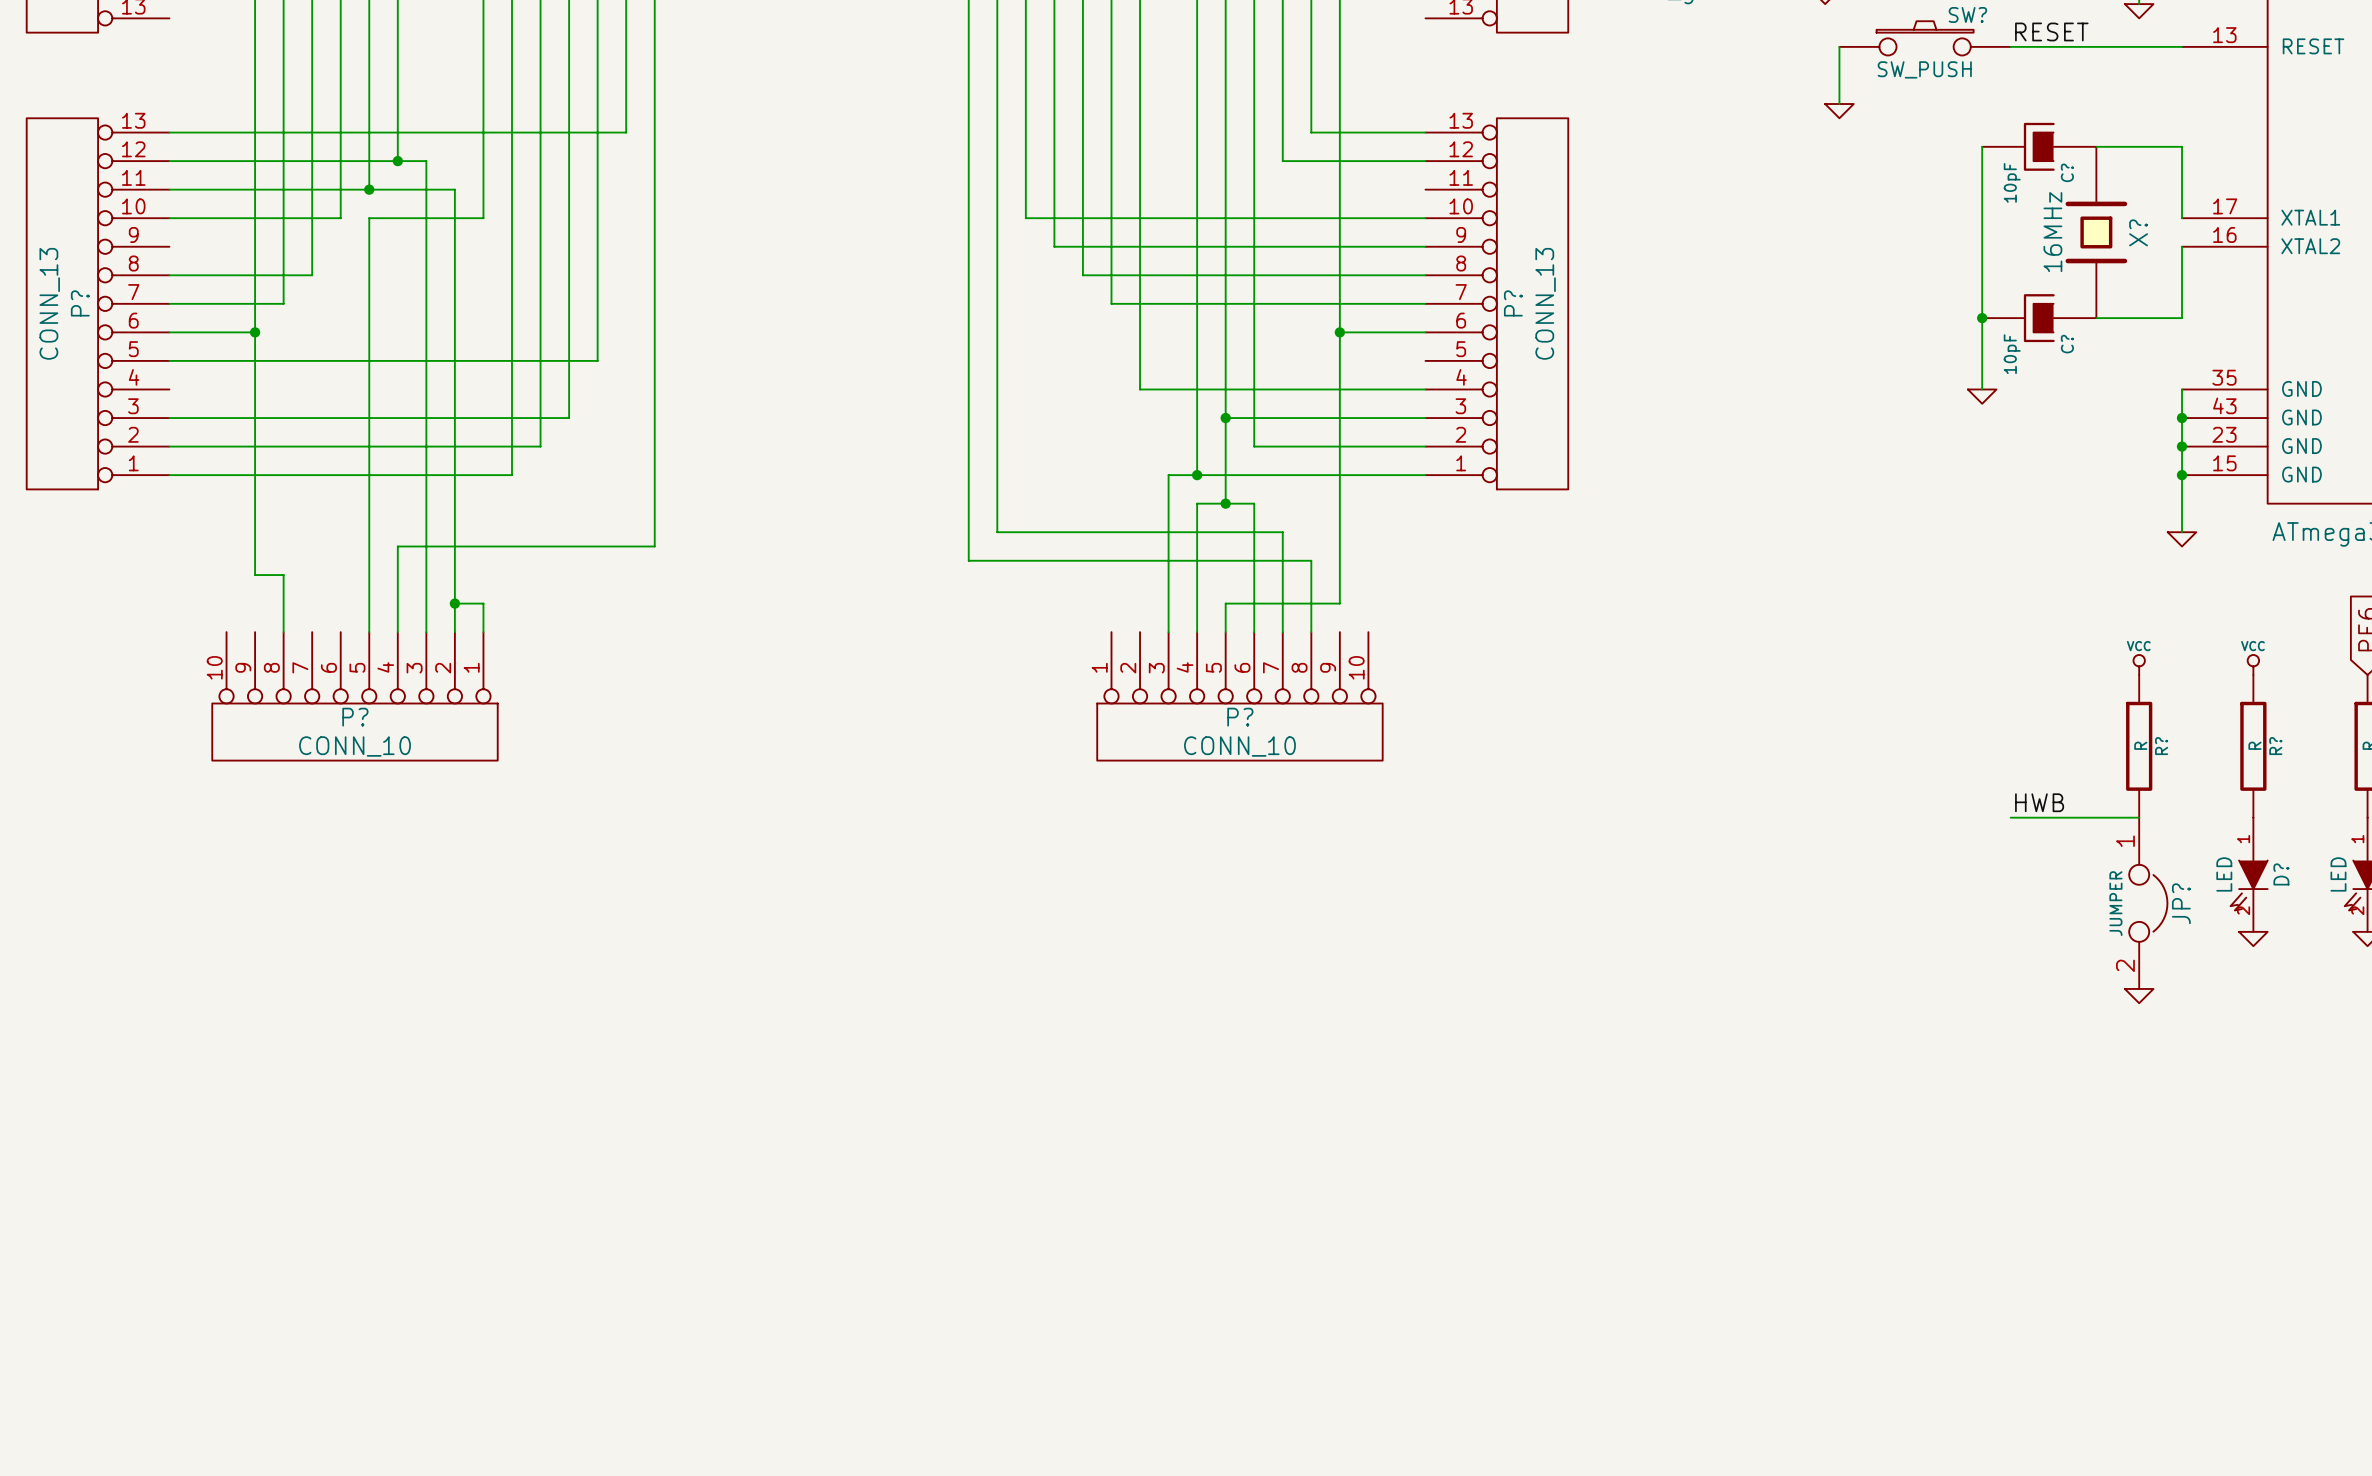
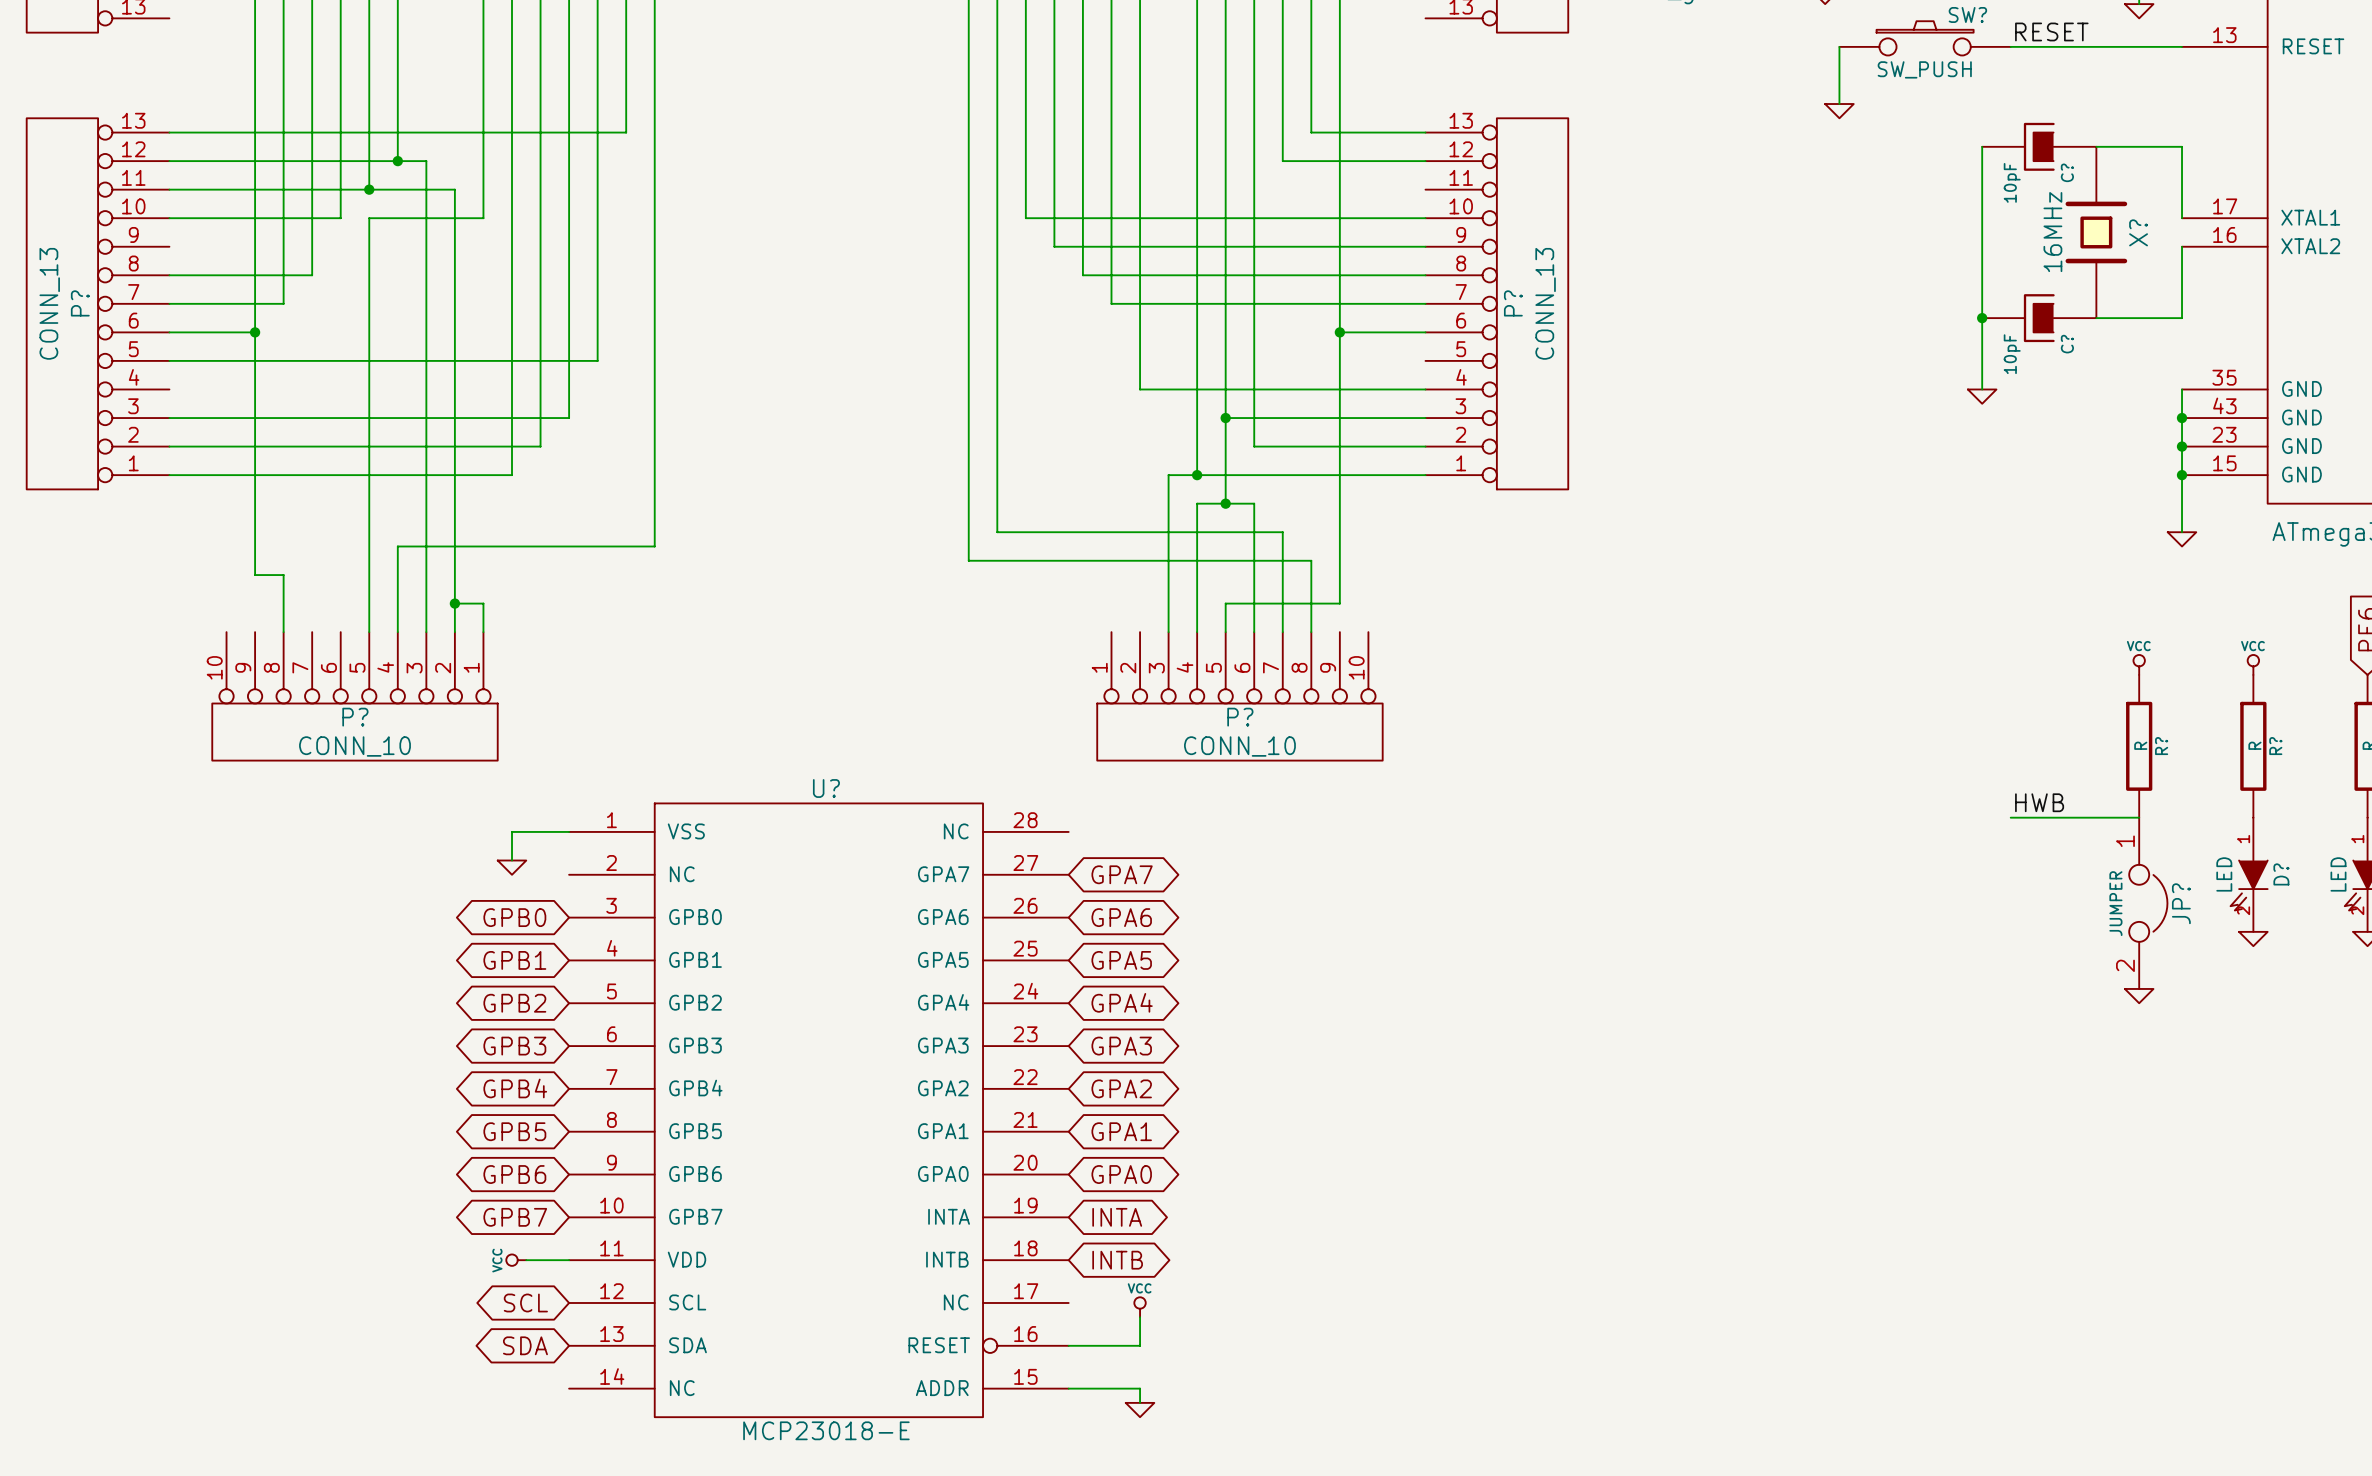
wire: none -> (569, 831) (512, 831) (512, 860)
power symbol: none -> (512, 867)
global label: none -> GPA7 (1122, 874)
global label: none -> GPB0 (514, 917)
global label: none -> GPA6 (1121, 917)
global label: none -> GPB1 (514, 960)
global label: none -> GPA5 (1121, 960)
global label: none -> GPA4 (1122, 1002)
global label: none -> GPB2 (514, 1003)
global label: none -> GPB3 (514, 1046)
global label: none -> GPA3 (1121, 1046)
global label: none -> GPB4 (515, 1088)
global label: none -> GPA2 (1121, 1088)
U?: none -> MCP23018-E (818, 1110)
global label: none -> GPB5 (514, 1131)
global label: none -> GPA1 (1121, 1131)
global label: none -> GPB6 (514, 1174)
global label: none -> GPA0 (1121, 1174)
global label: none -> GPB7 (515, 1217)
global label: none -> INTA (1117, 1217)
power symbol: none -> VCC (516, 1260)
wire: none -> (526, 1260) (569, 1260)
global label: none -> INTB (1117, 1260)
global label: none -> SCL (525, 1302)
power symbol: none -> VCC (1140, 1307)
wire: none -> (1140, 1317) (1140, 1345) (1068, 1345)
global label: none -> SDA (525, 1345)
wire: none -> (1068, 1388) (1140, 1388) (1140, 1402)
power symbol: none -> (1140, 1410)

